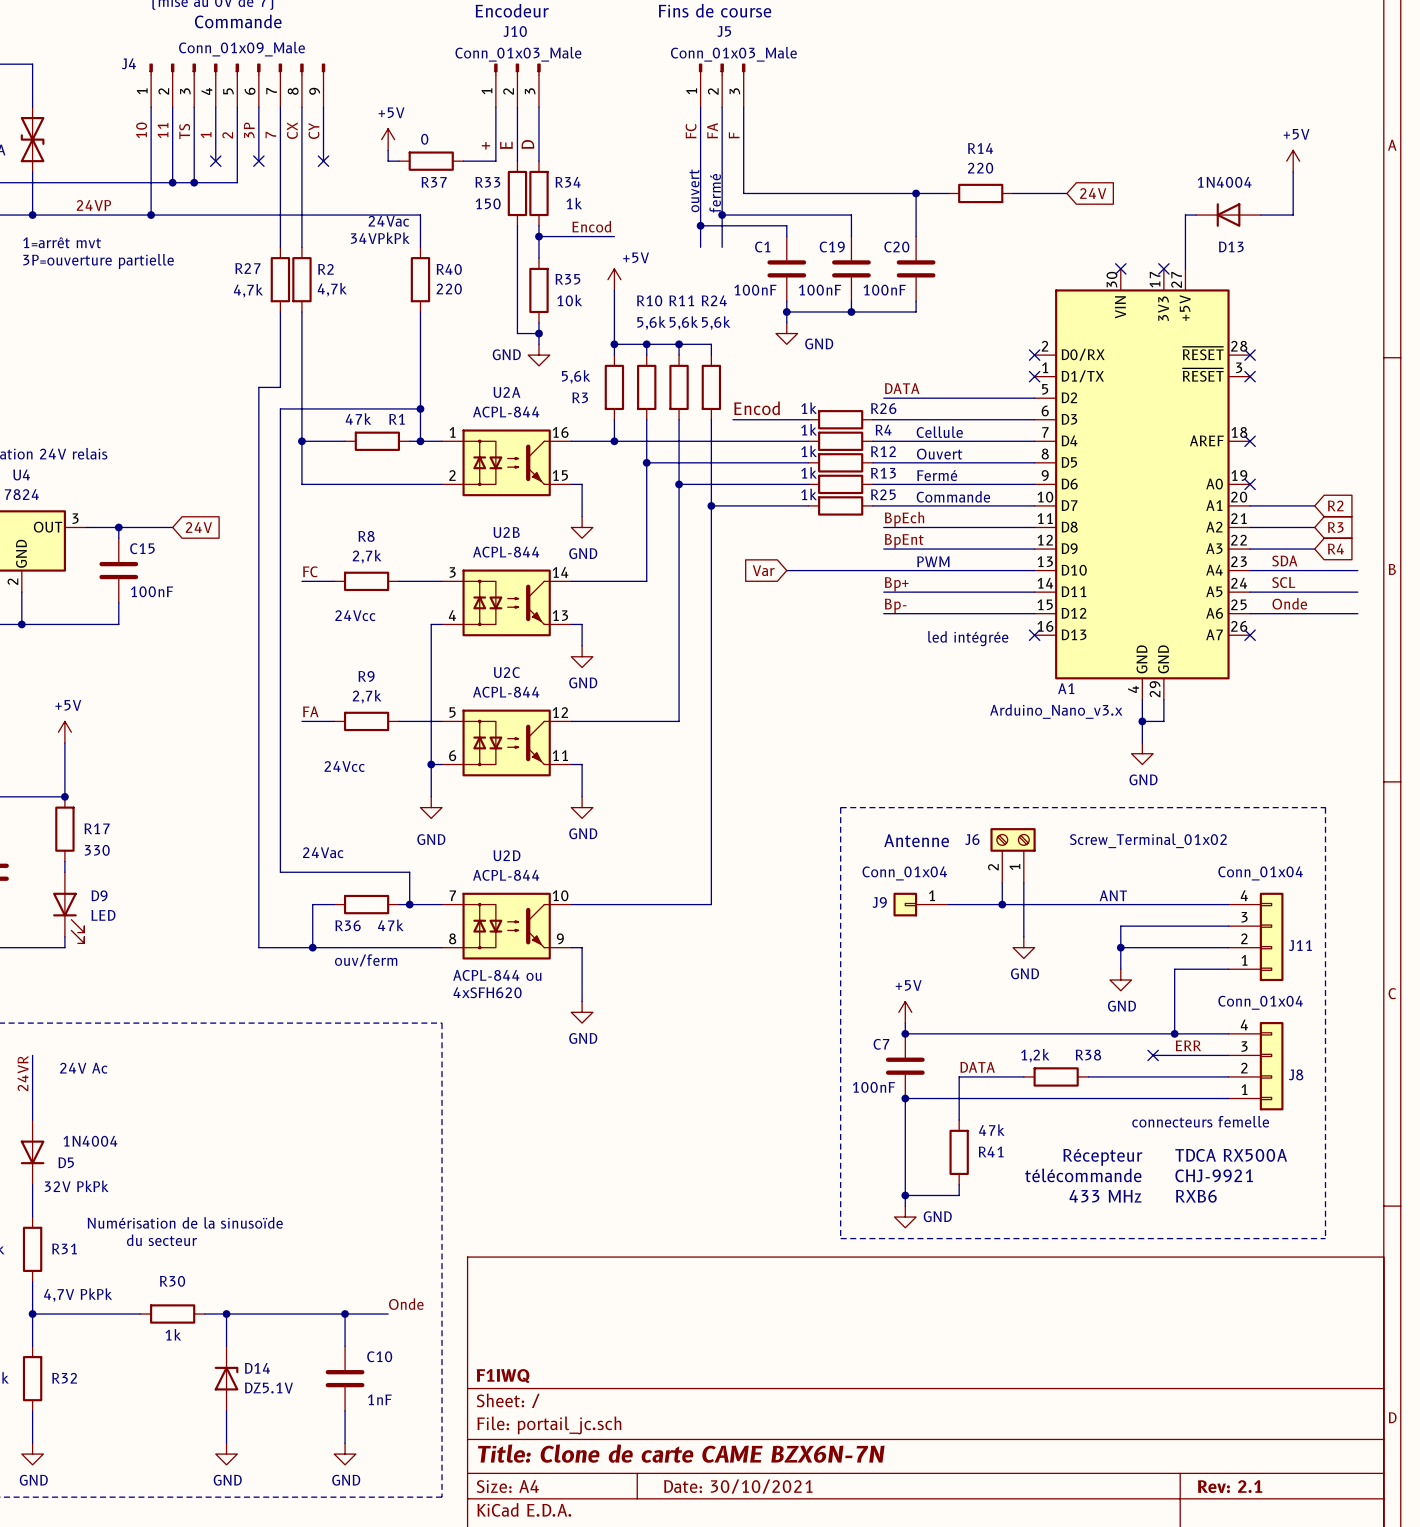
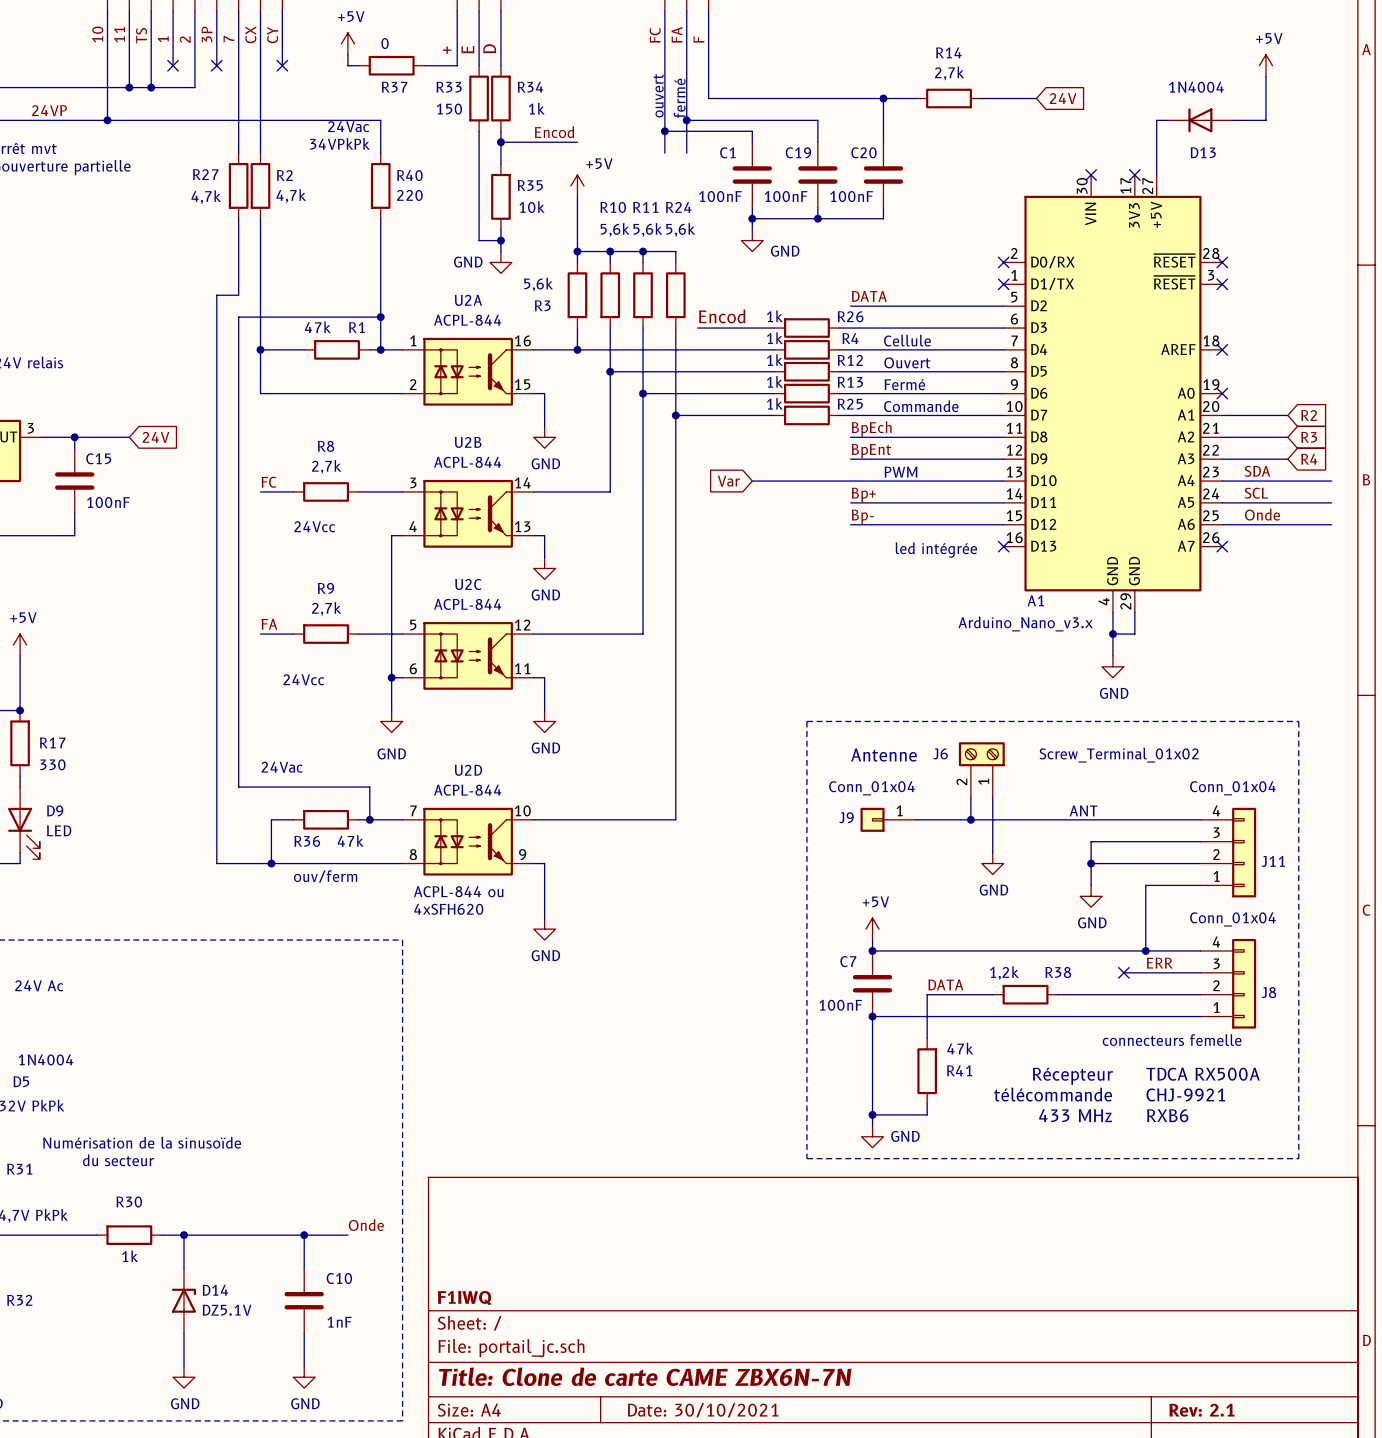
R14 value: 220 (980, 168) -> 2,7k (949, 73)
title block: Title: Clone de carte CAME BZX6N-7N (681, 1453) -> Title: Clone de carte CAME ZBX6N-7N (645, 1376)

